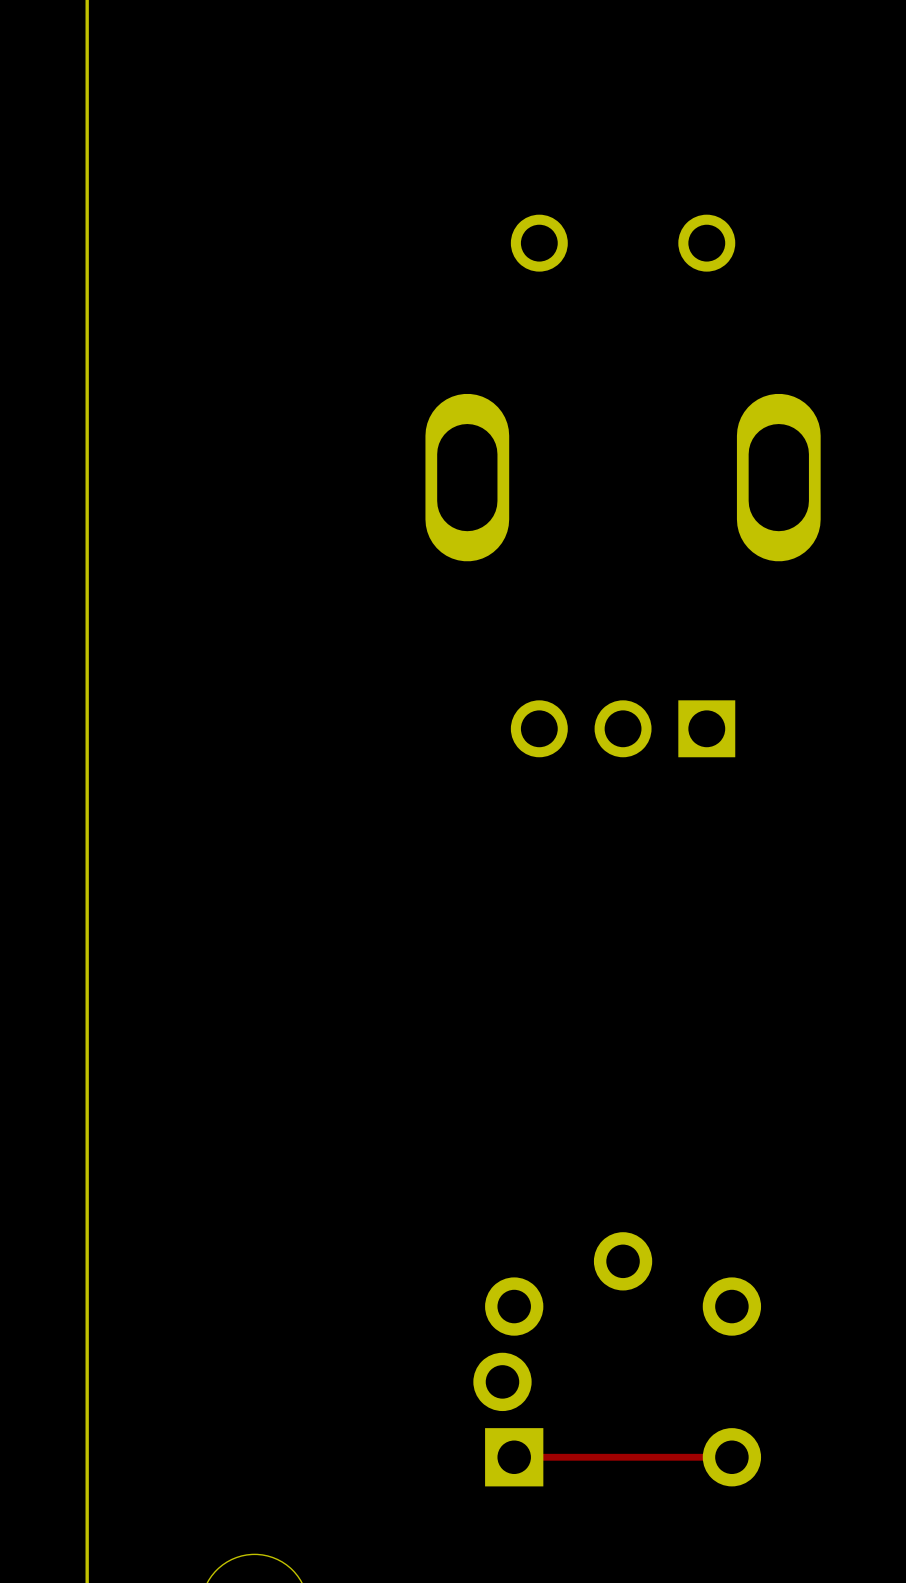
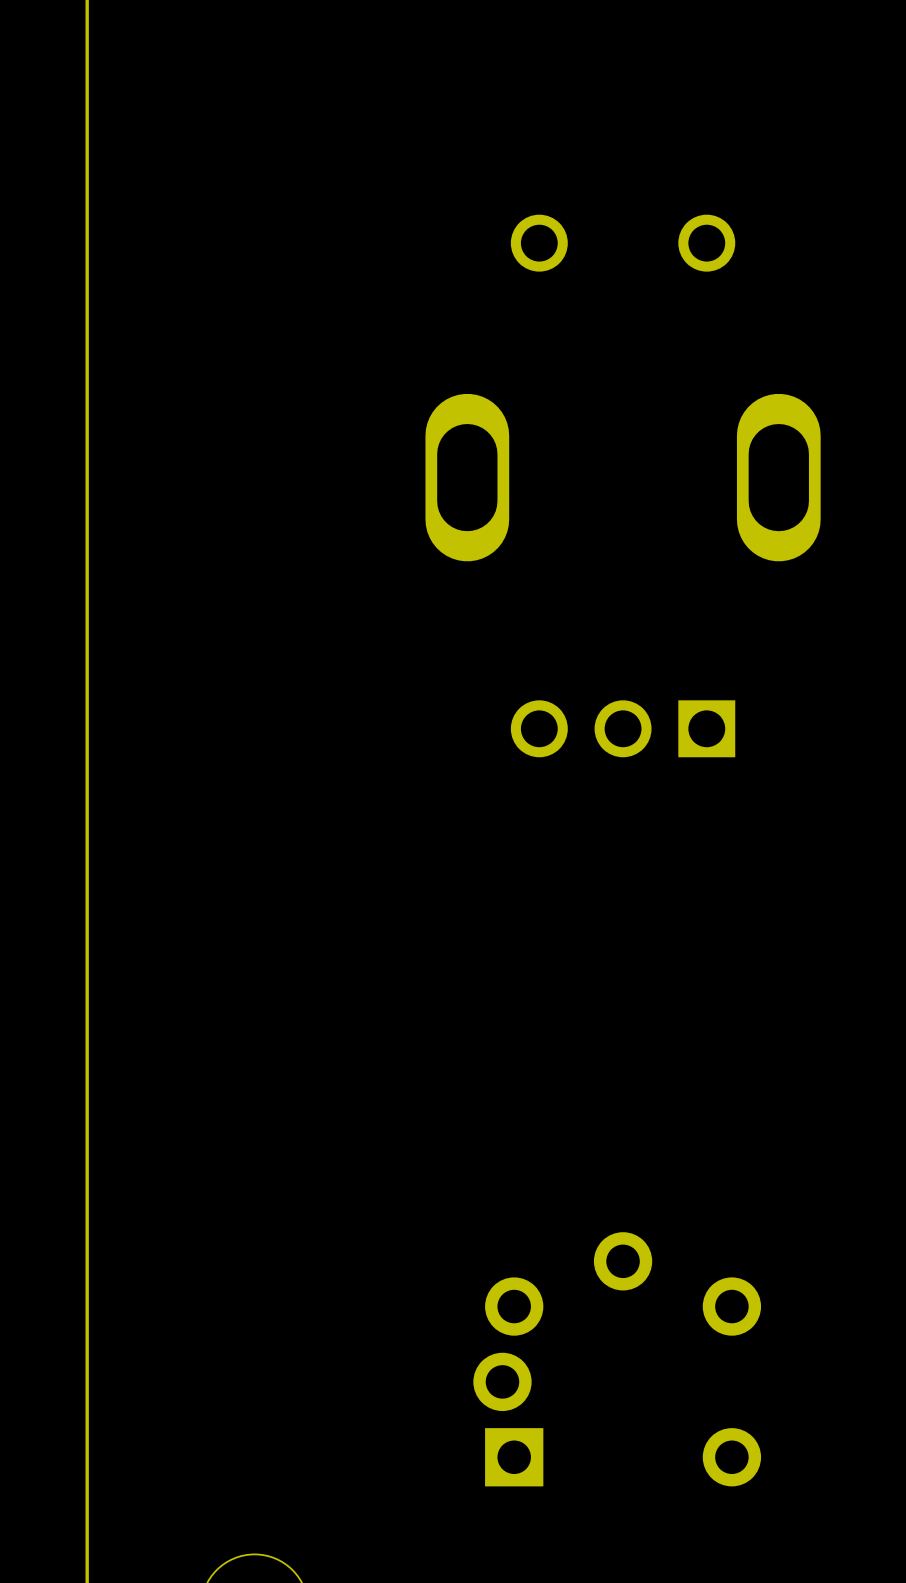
top track: (731, 1457) (514, 1457) -> none

